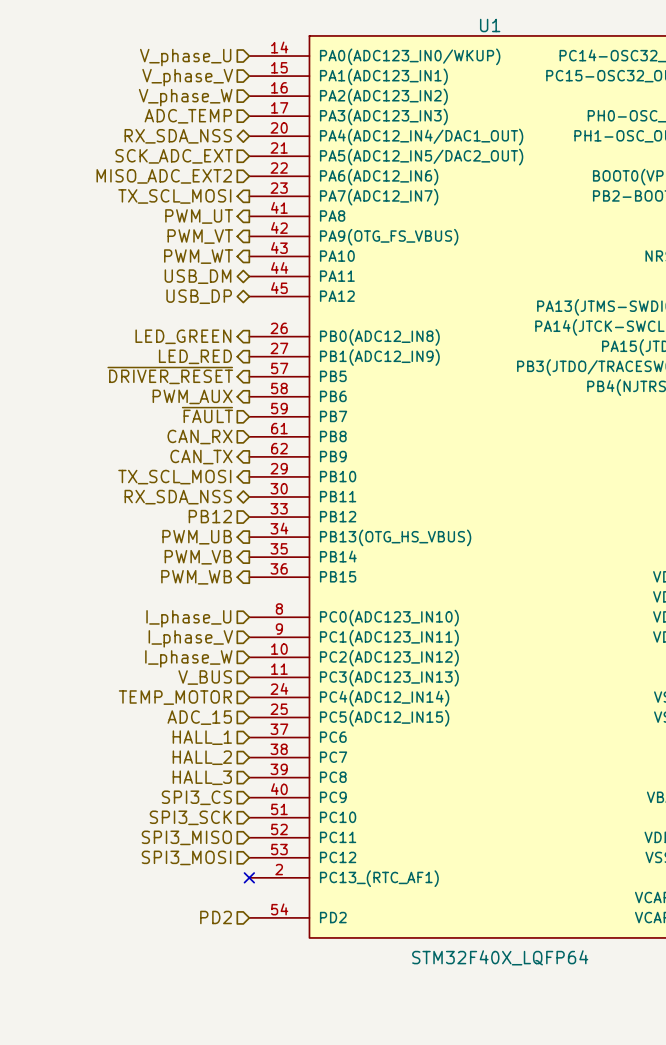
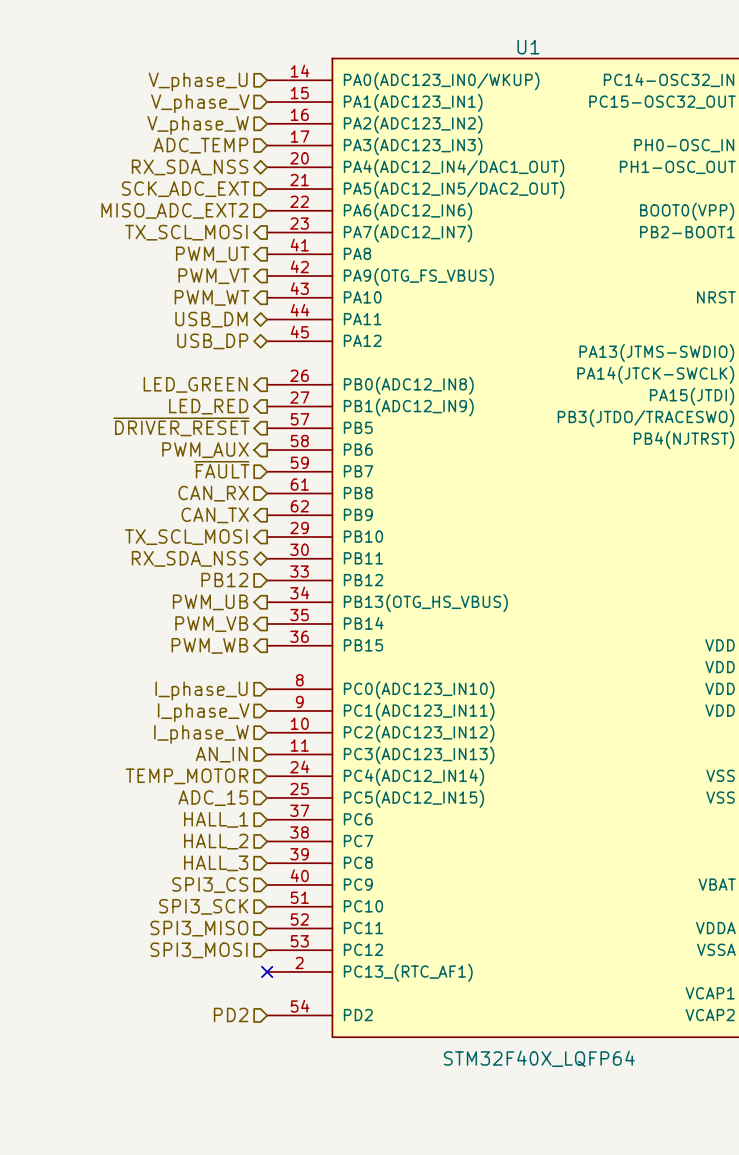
hierarchical label: V_BUS (205, 677) -> AN_IN (221, 754)

